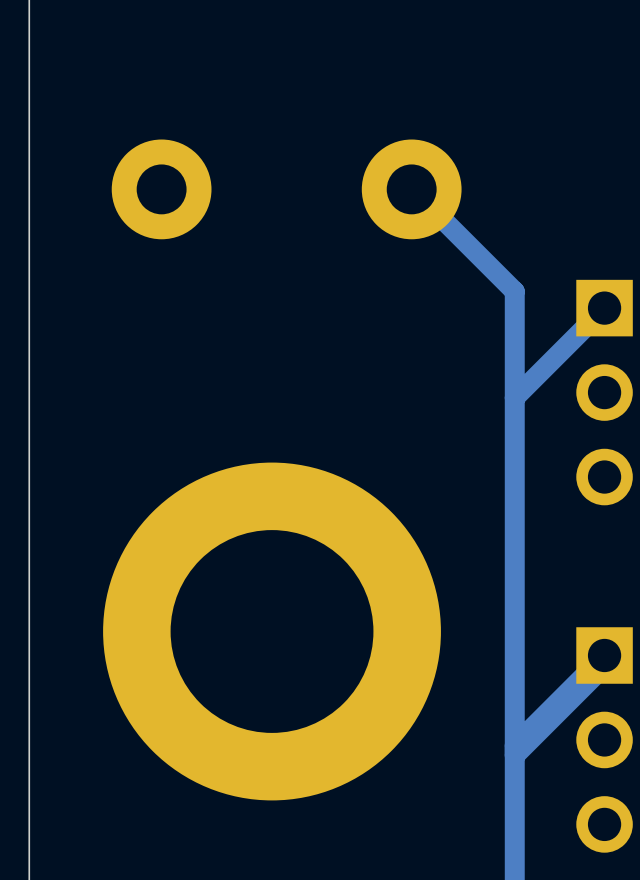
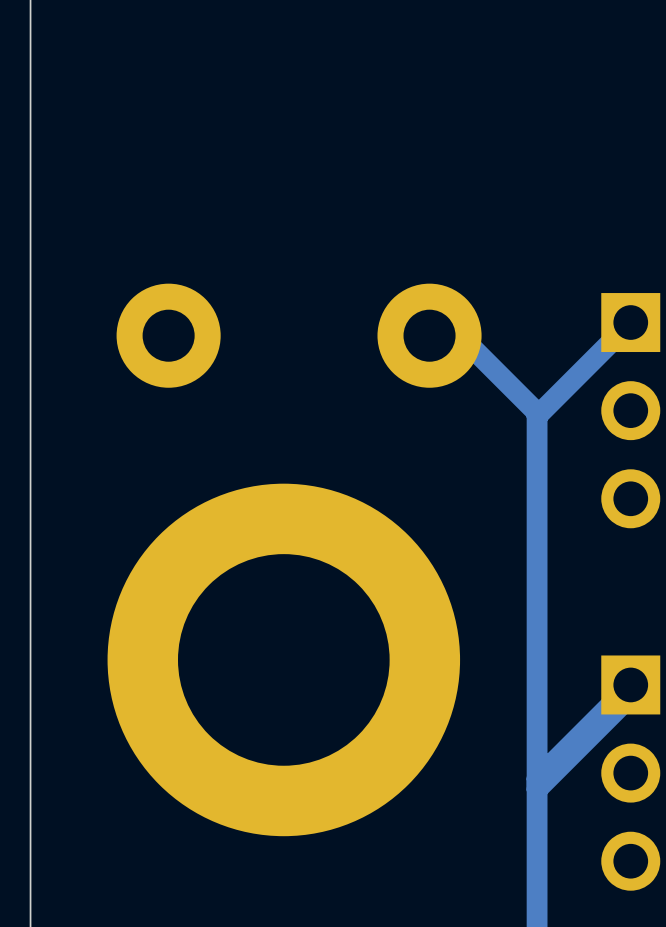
part position: (161, 189) -> (168, 335)
track: (411, 189) (514, 291) (514, 394) -> (429, 335) (460, 335) (537, 412)
part position: (411, 189) -> (429, 335)

